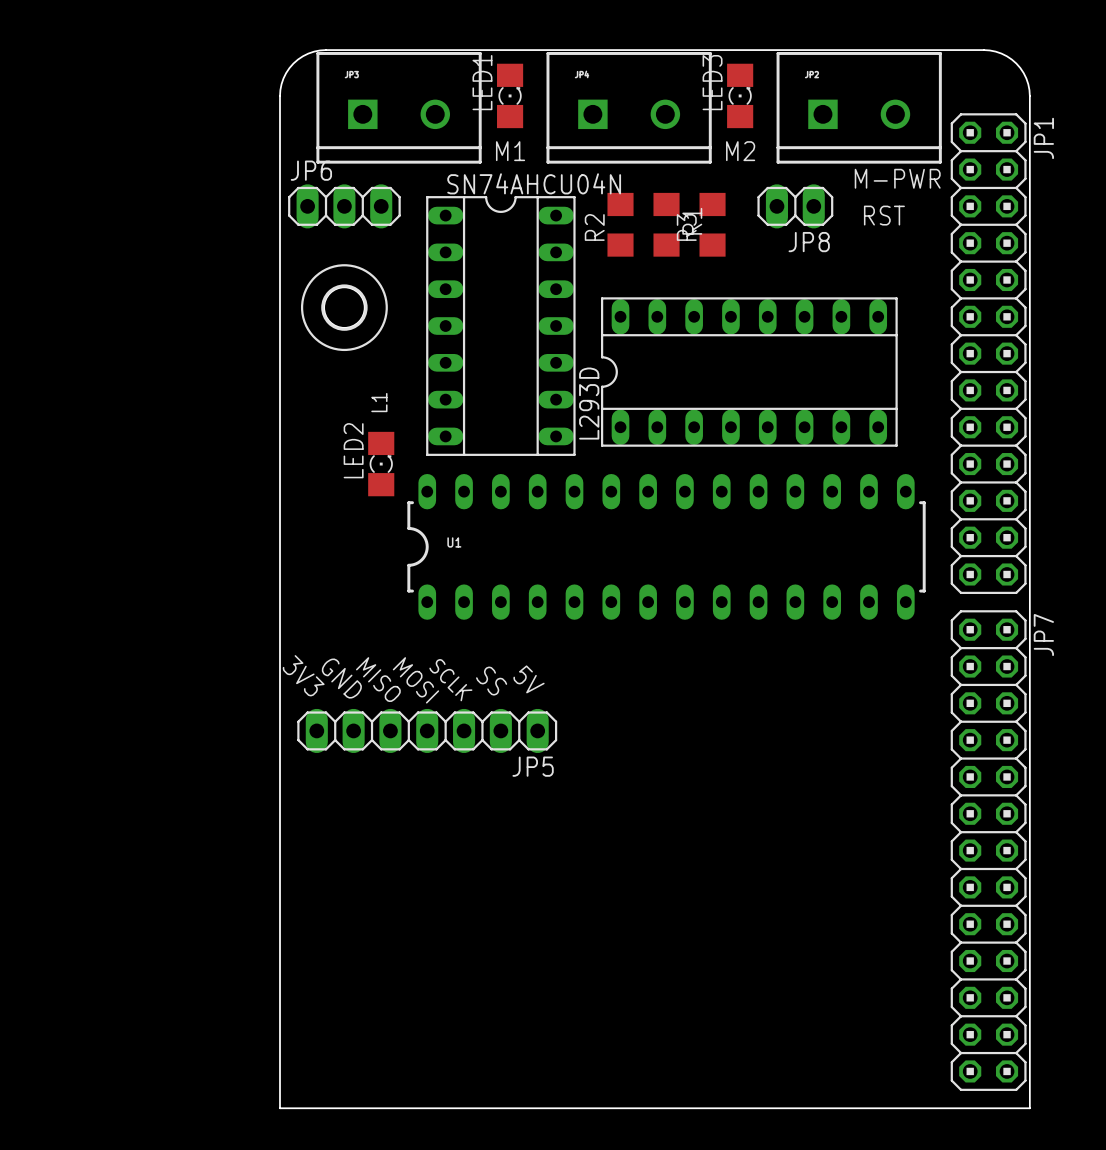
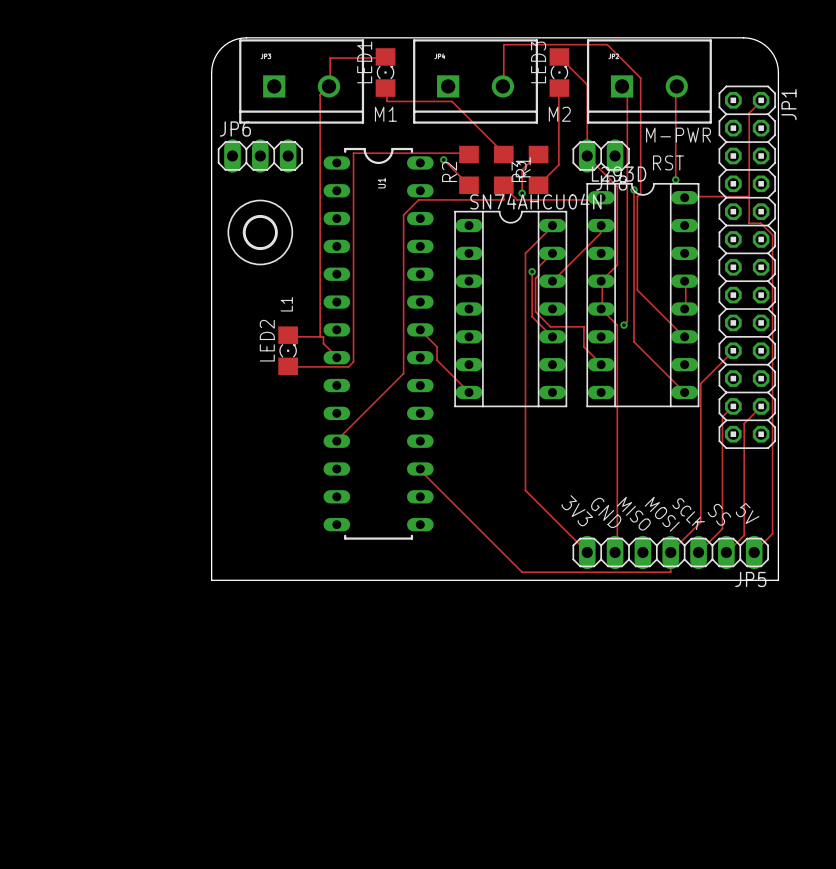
track: none -> (385, 56) (330, 58) (330, 86) (320, 94) (320, 336)
track: none -> (559, 56) (587, 84) (587, 156) (617, 186) (617, 265) (601, 281) (601, 309) (617, 325) (617, 550) (615, 552)
track: none -> (502, 86) (503, 44) (607, 44) (640, 78) (640, 193) (637, 196) (637, 290) (684, 336)
track: none -> (622, 86) (627, 91) (627, 321) (623, 325)
track: none -> (676, 86) (675, 179)
track: none -> (385, 88) (386, 101) (452, 101) (503, 154)
track: none -> (559, 88) (558, 164) (538, 185)
track: none -> (761, 100) (749, 113) (749, 223) (760, 223) (772, 235) (772, 533) (754, 552)
track: none -> (469, 154) (353, 153) (353, 361) (348, 366) (288, 366)
track: none -> (538, 154) (522, 169) (522, 193)
track: none -> (443, 159) (469, 185)
via: none -> (443, 159)
via: none -> (675, 179)
track: none -> (503, 185) (503, 199) (418, 199) (403, 214) (403, 373) (336, 441)
track: none -> (503, 186) (517, 199) (600, 199) (601, 197)
track: none -> (634, 189) (634, 341) (684, 392)
via: none -> (634, 189)
via: none -> (522, 193)
track: none -> (749, 196) (684, 197)
track: none -> (552, 225) (525, 253) (525, 490) (587, 552)
track: none -> (601, 225) (600, 233) (552, 281)
SN74AHCU04N position: (500, 326) -> (510, 309)
track: none -> (552, 253) (538, 266) (538, 275) (535, 278) (535, 311) (550, 326) (583, 326) (583, 346) (601, 364)
track: none -> (532, 271) (532, 316) (552, 336)
via: none -> (532, 271)
L293D rotation: 0° (749, 372) -> 90° clockwise (642, 295)
track: none -> (684, 281) (684, 309)
via: none -> (623, 325)
track: none -> (420, 329) (437, 346) (437, 360) (469, 392)
track: none -> (288, 335) (288, 336) (323, 336) (323, 343) (336, 357)
track: none -> (733, 350) (700, 383) (700, 522) (670, 552) (670, 572) (522, 572) (420, 469)
track: none -> (733, 406) (722, 416) (722, 528) (698, 552)
track: none -> (761, 406) (744, 423) (744, 535) (726, 552)
U1 rotation: 0° (666, 546) -> 90° clockwise (378, 343)
text: 3V3 (303, 675) -> none
text: none -> 3V3 (577, 510)
text: GND (341, 678) -> none
text: none -> GND (606, 512)
text: MISO (378, 679) -> none
text: 5V (529, 679) -> none
text: none -> MISO (633, 513)
text: none -> 5V (747, 513)
text: MOSI (415, 680) -> none
text: SCLK (450, 680) -> none
text: none -> MOSI (662, 514)
text: none -> SCLK (688, 514)
text: SS (491, 681) -> none
text: none -> SS (719, 514)
JP5 position: (427, 730) -> (670, 552)
board edge: (279, 767) (279, 1108) (1029, 1108) (1029, 767) -> (211, 580) (778, 580)
JP7: (988, 850) -> none

